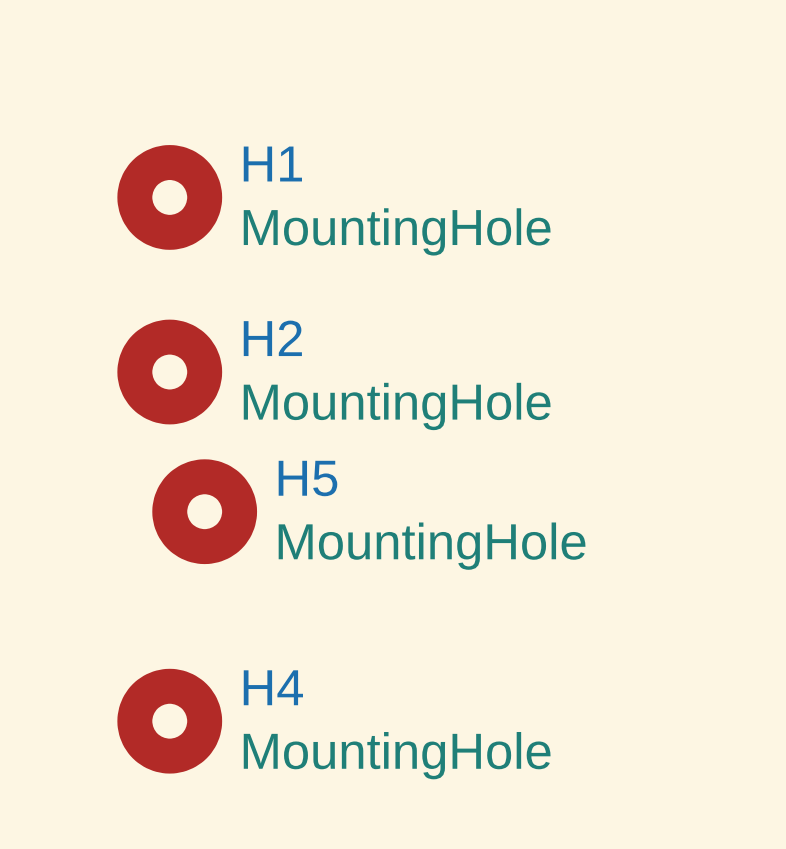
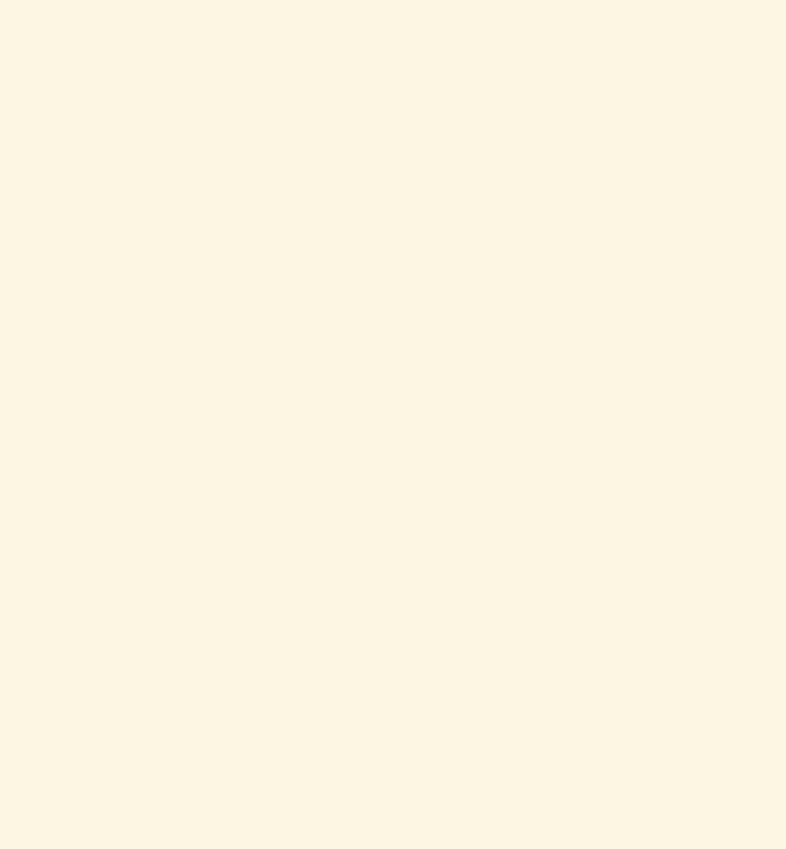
H1: MountingHole (169, 197) -> none
H2: MountingHole (169, 372) -> none
H5: MountingHole (204, 511) -> none
H4: MountingHole (169, 721) -> none

